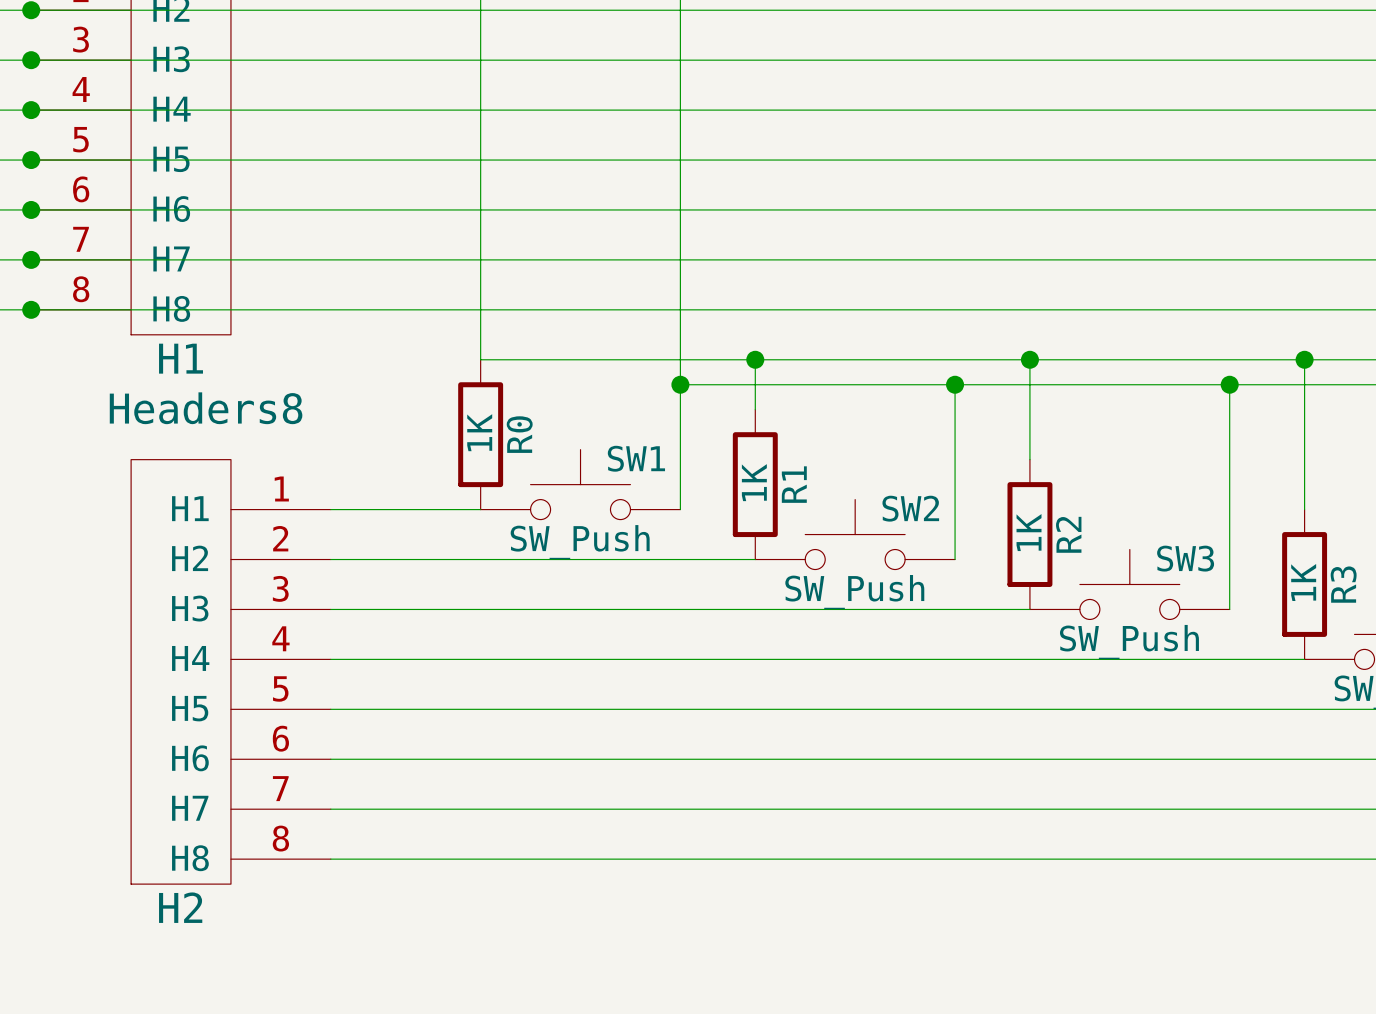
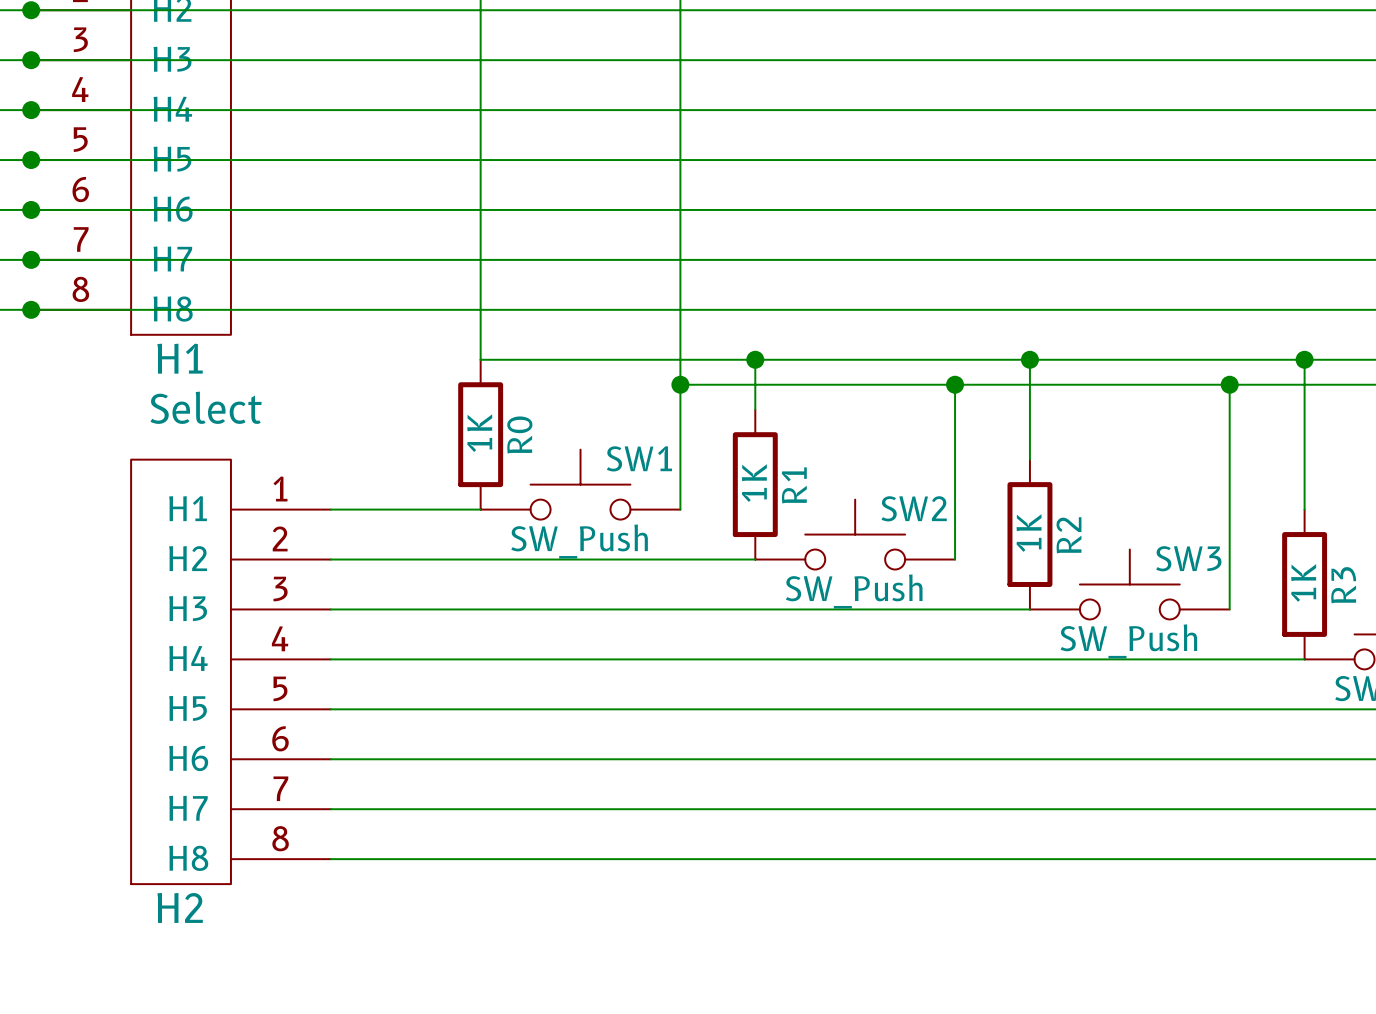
H2 value: Headers8 (206, 408) -> Select (206, 407)

